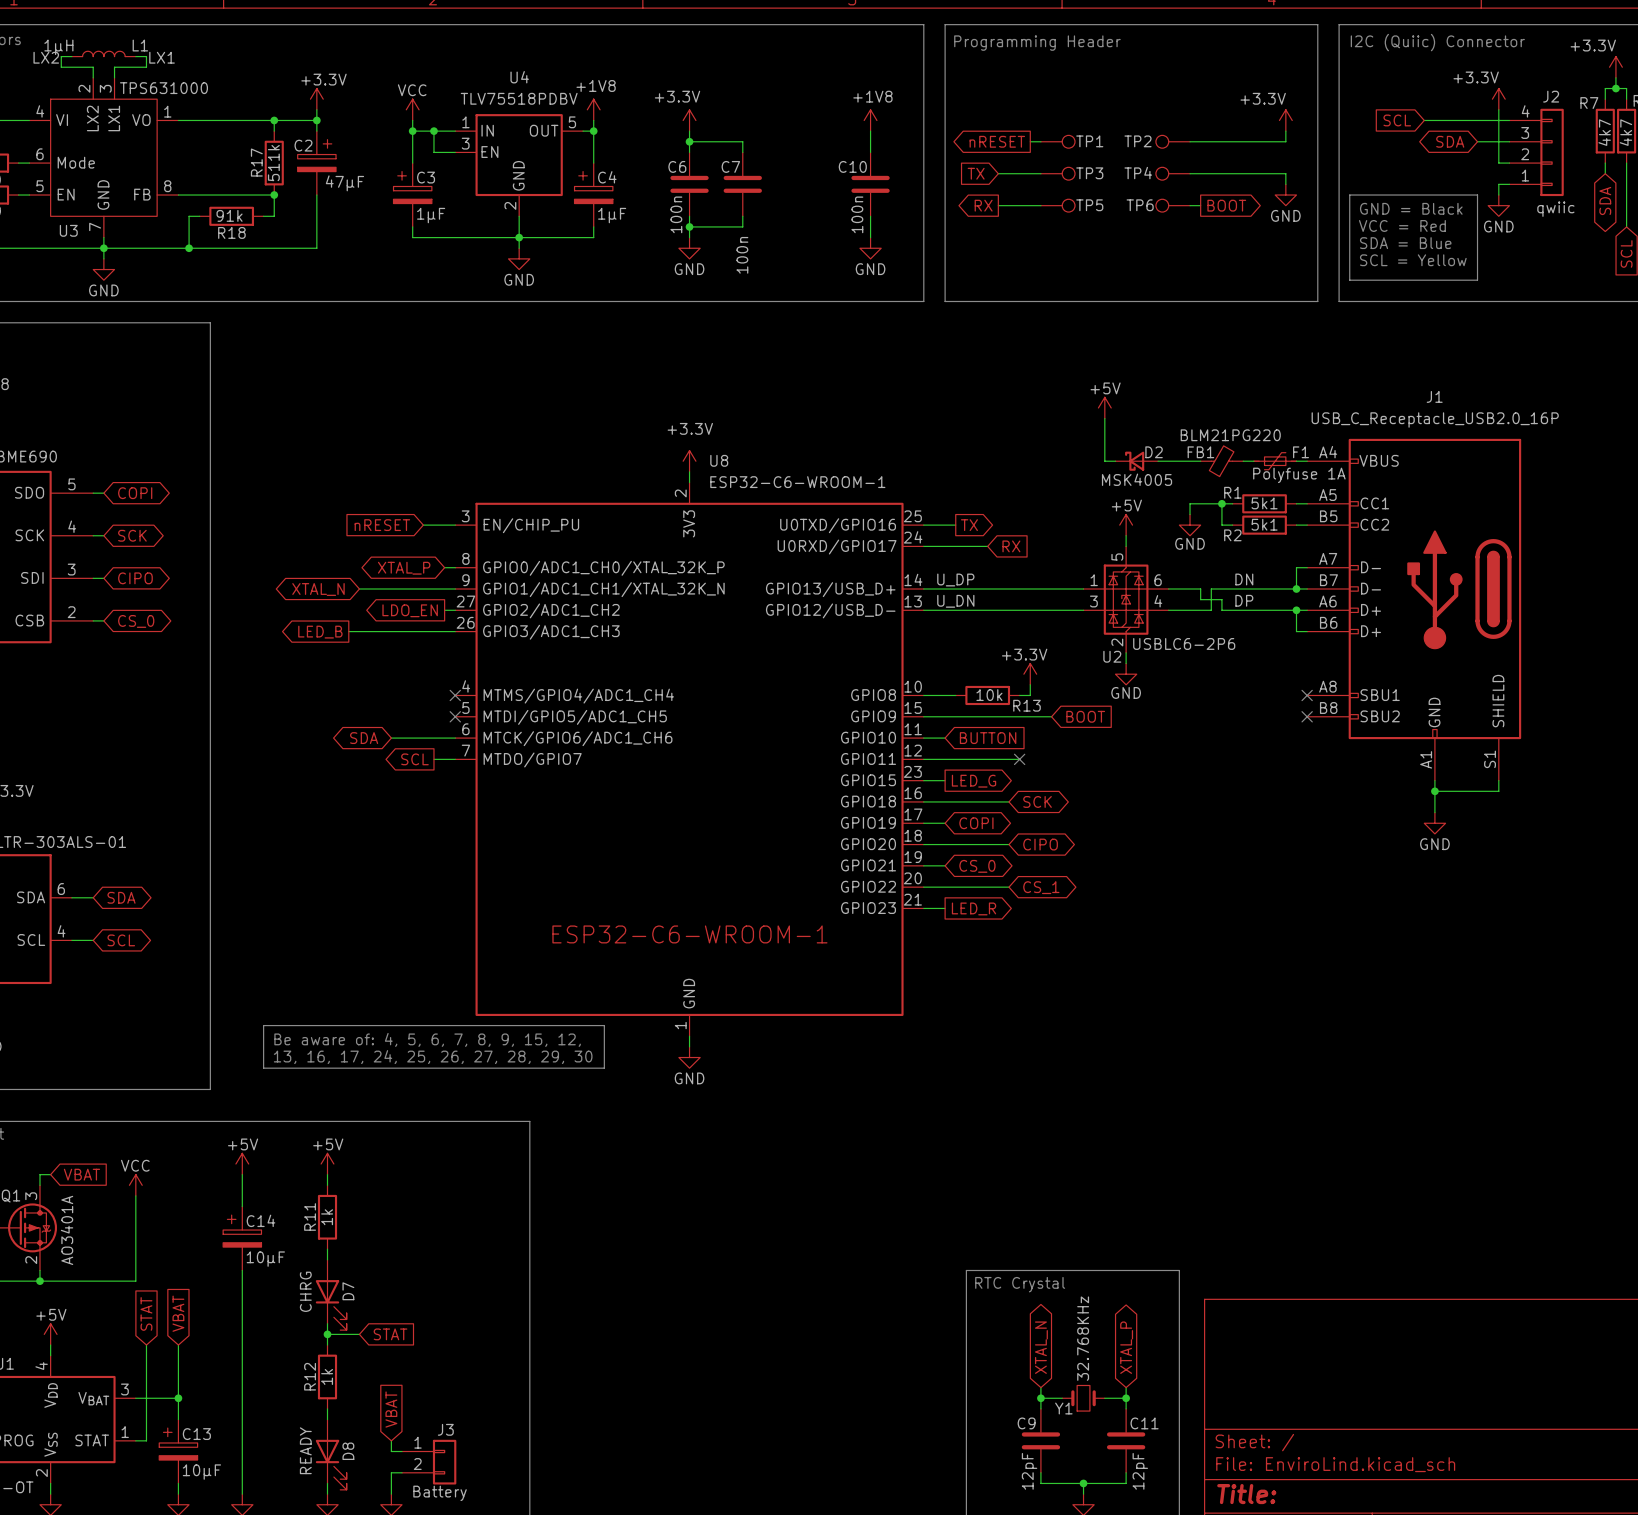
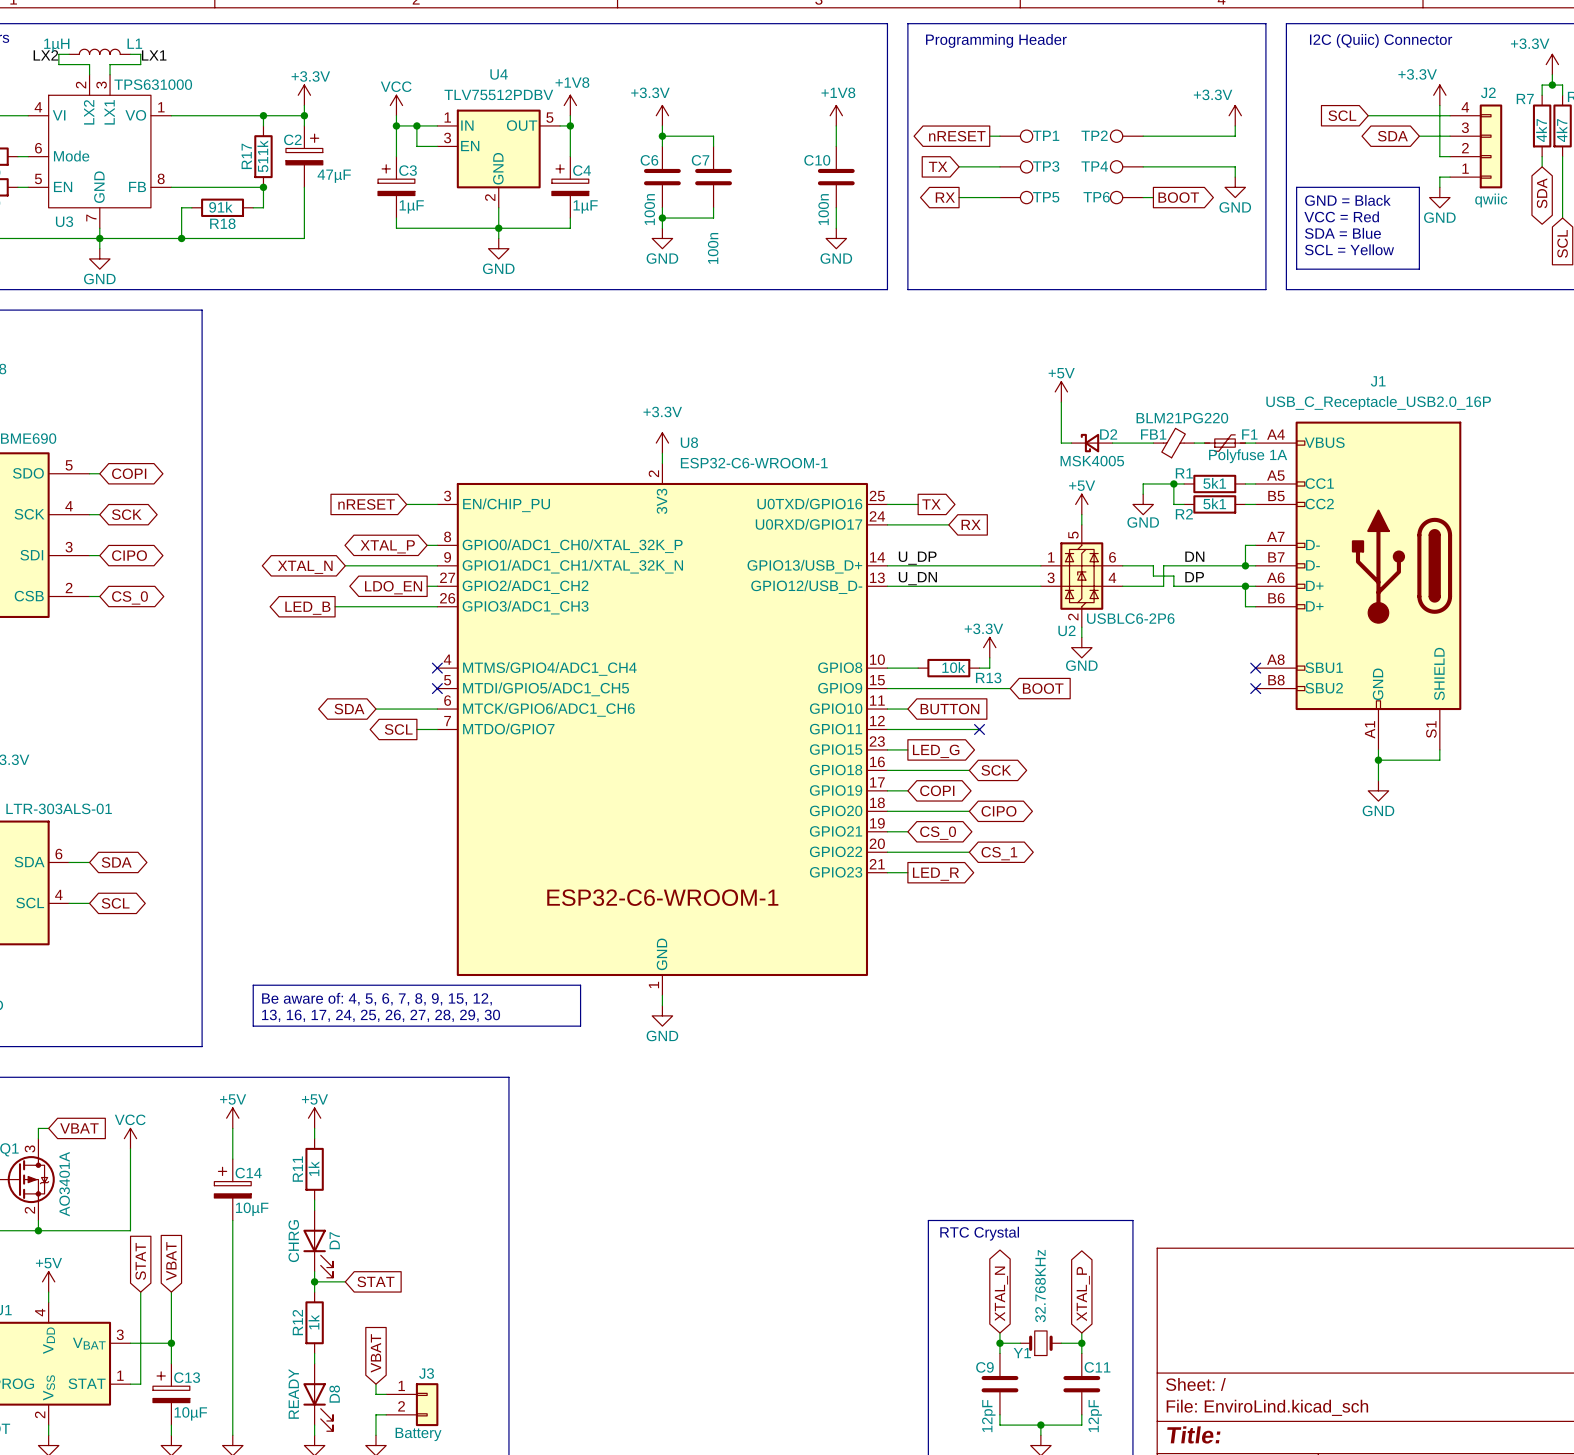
U4 value: TLV75518PDBV (519, 98) -> TLV75512PDBV (498, 94)

